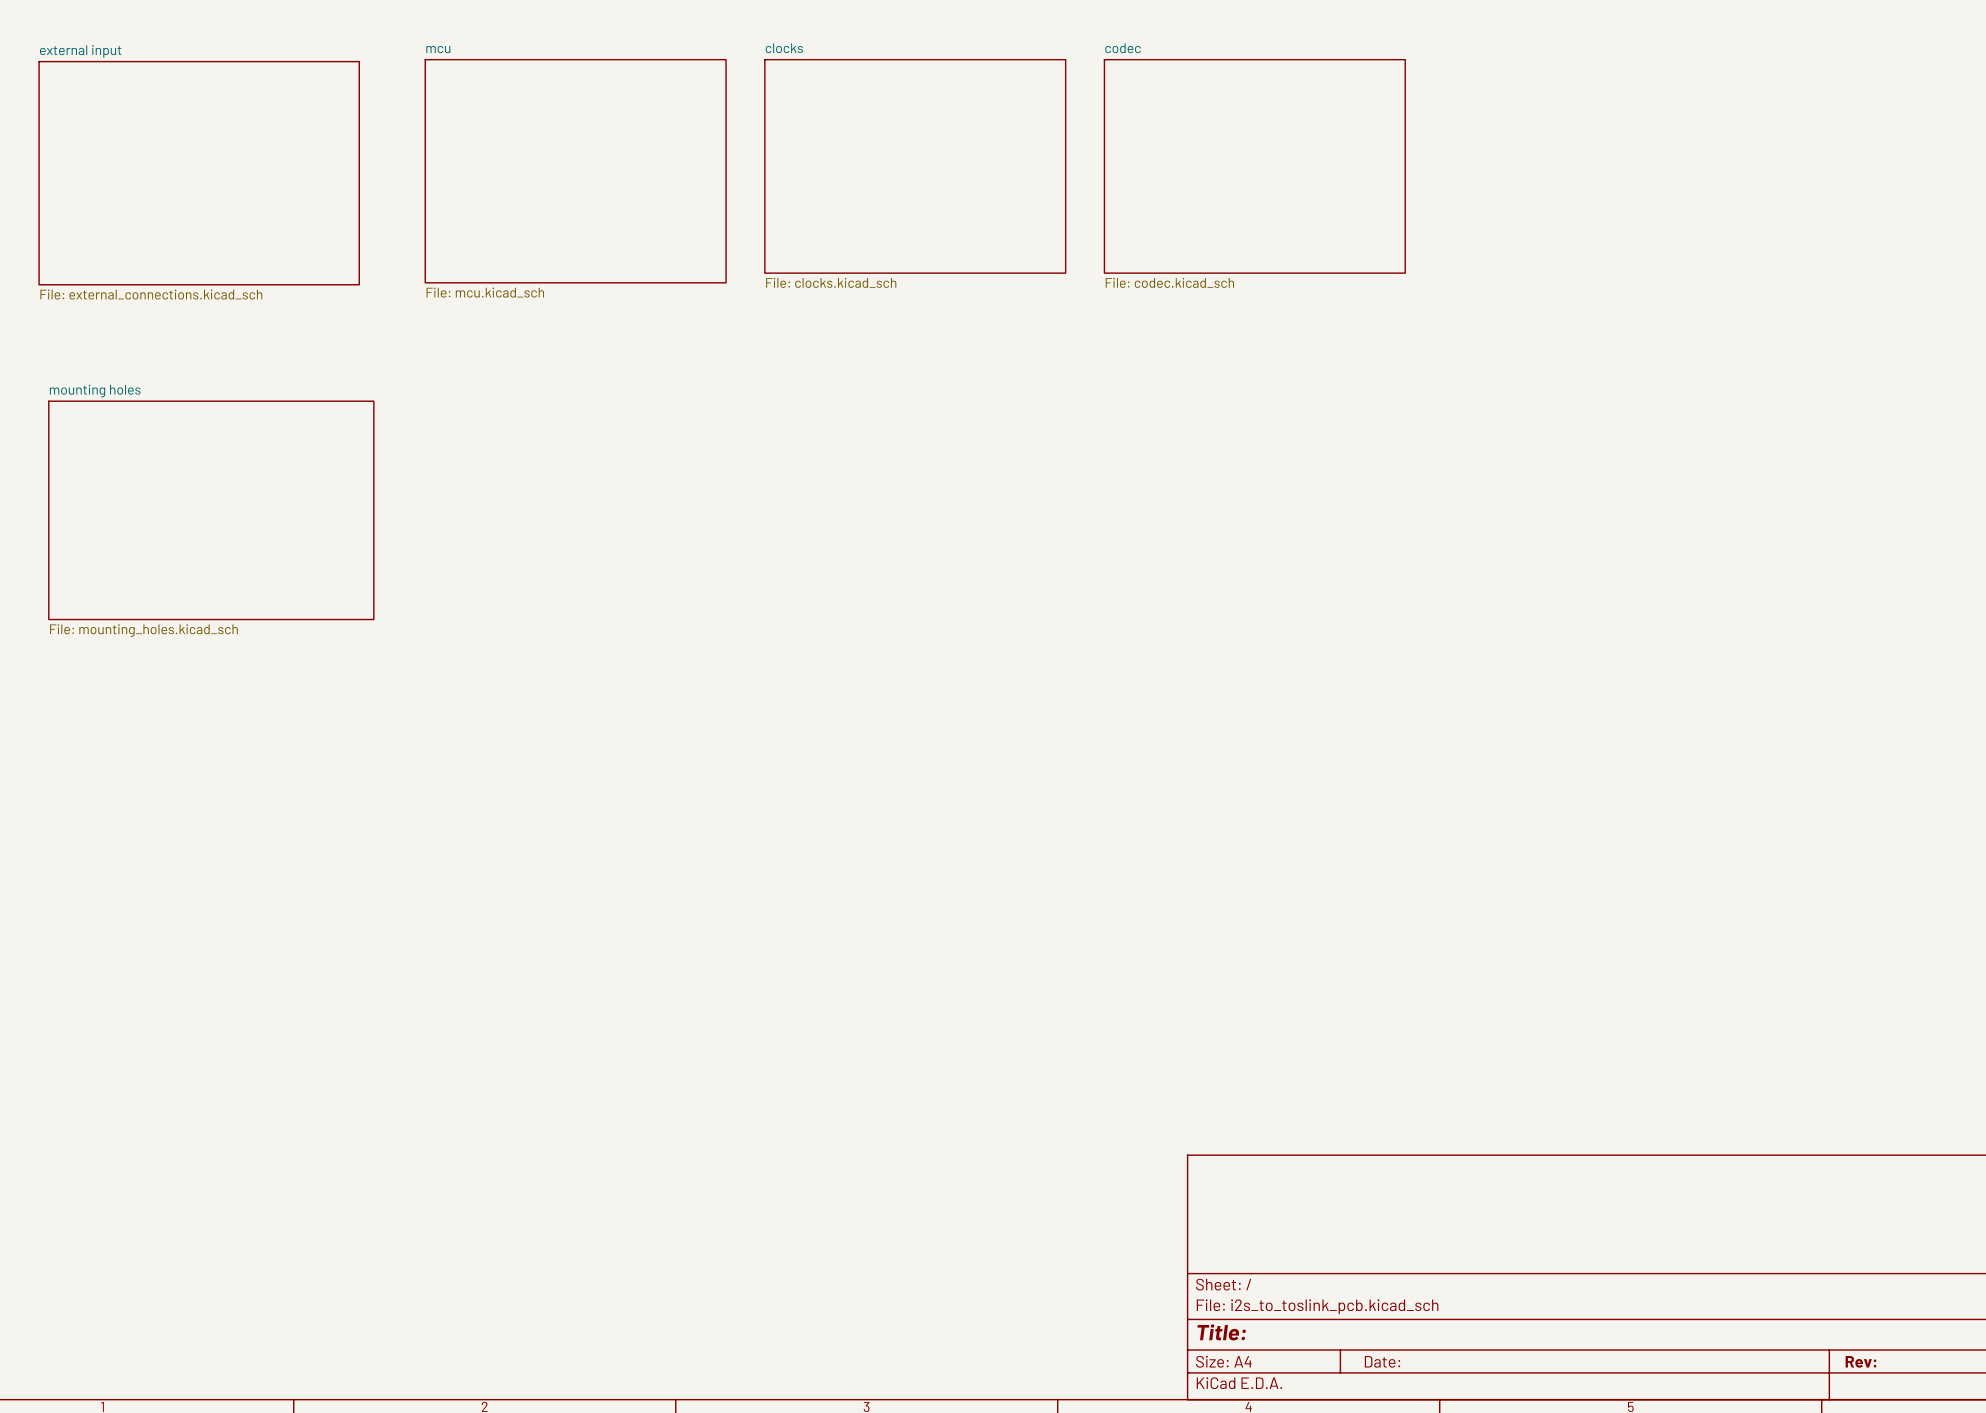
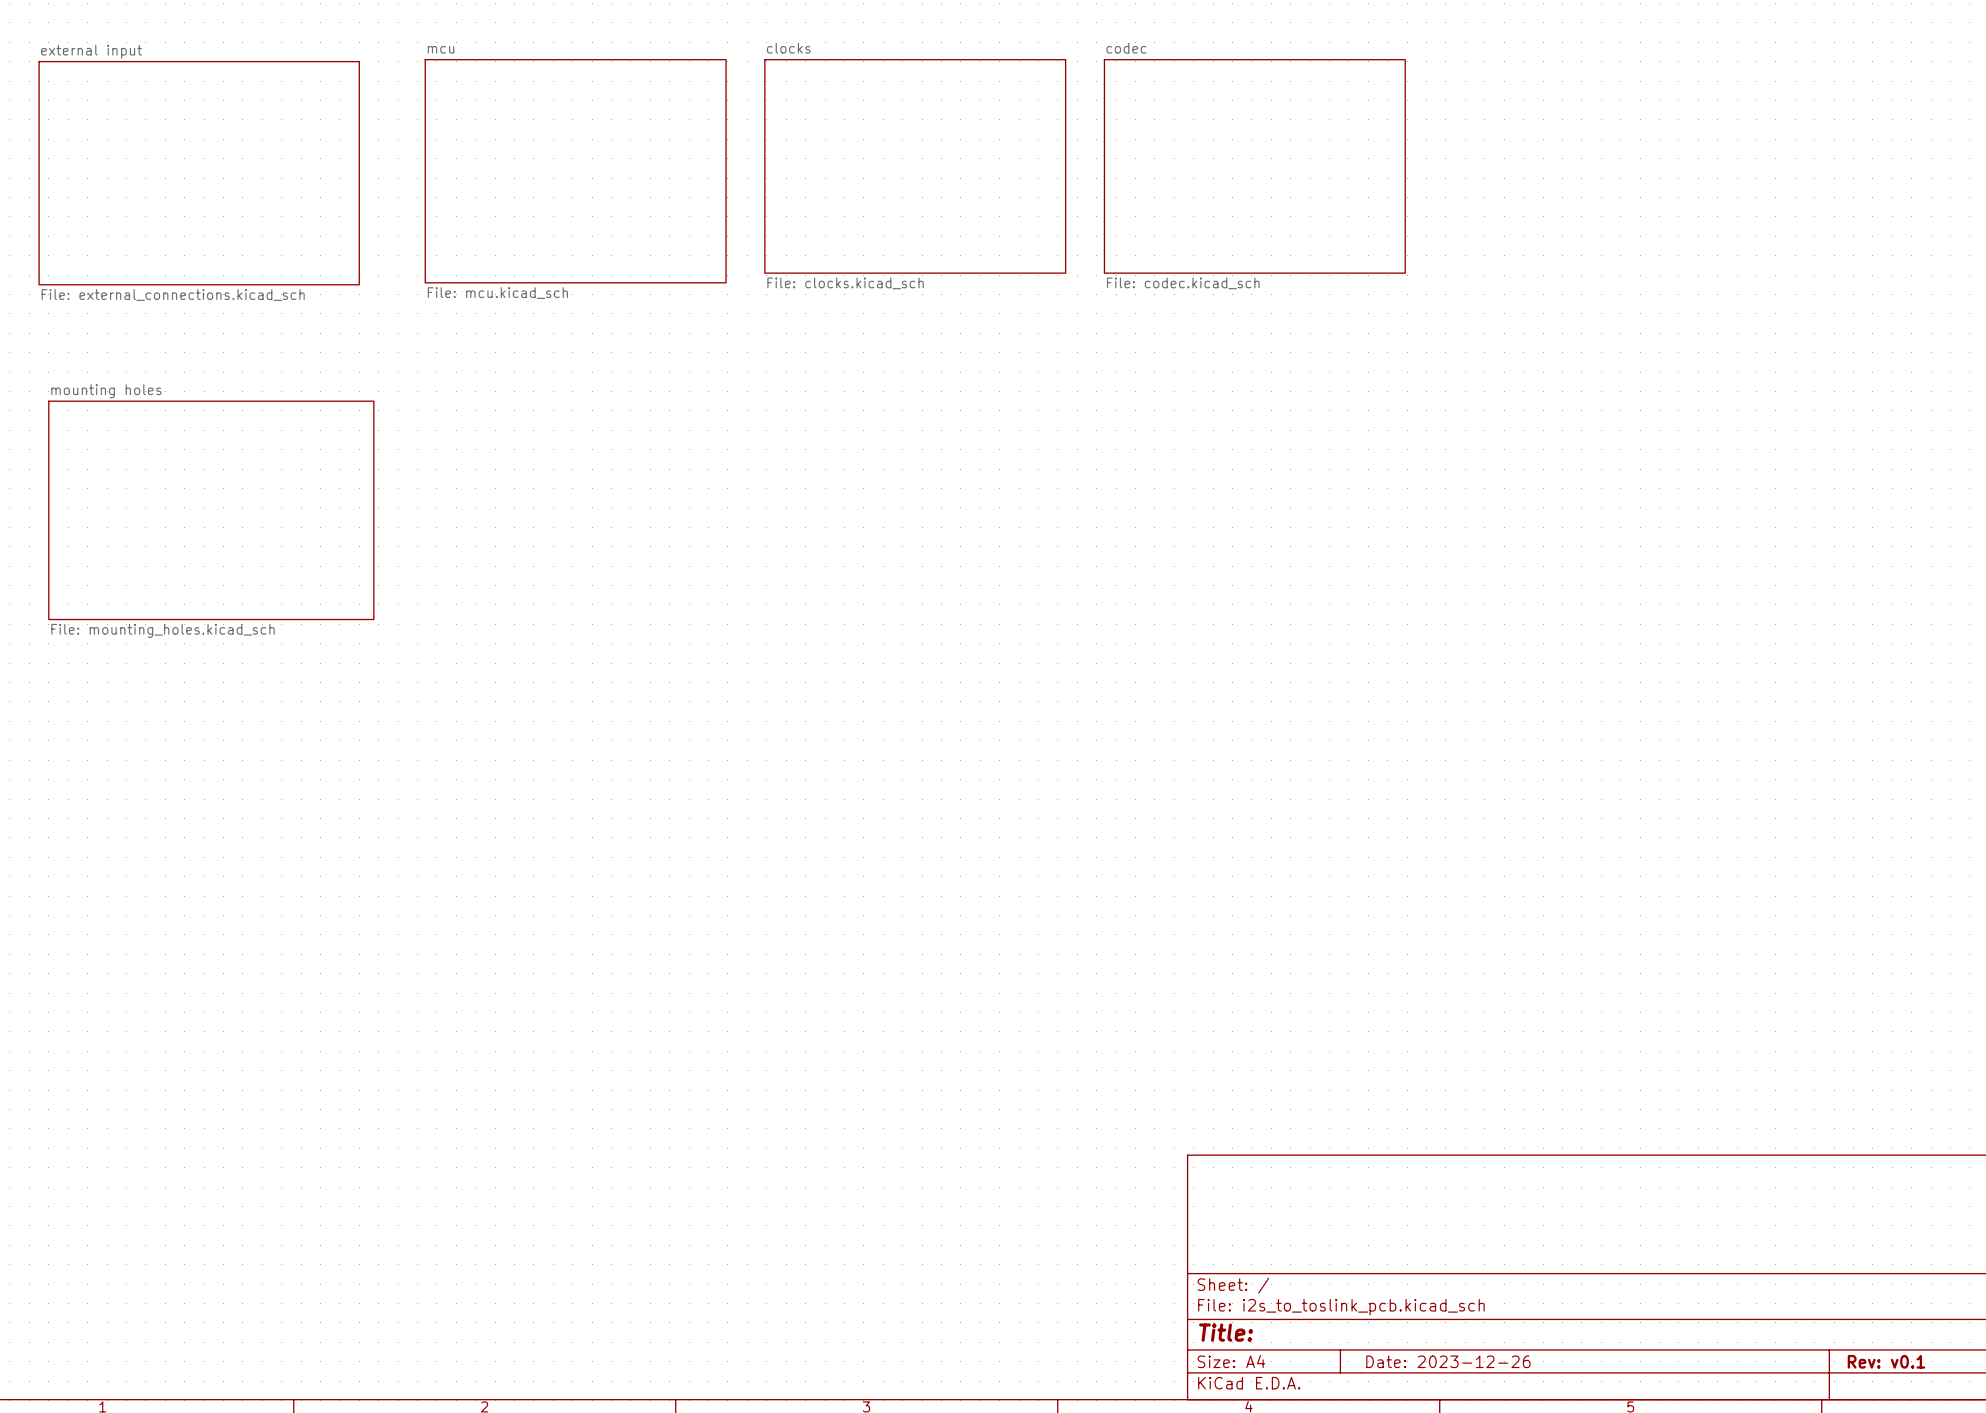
title block: Date: (1382, 1361) -> Date: 2023-12-26 (1448, 1361)
title block: Rev: (1860, 1361) -> Rev: v0.1 (1886, 1361)

